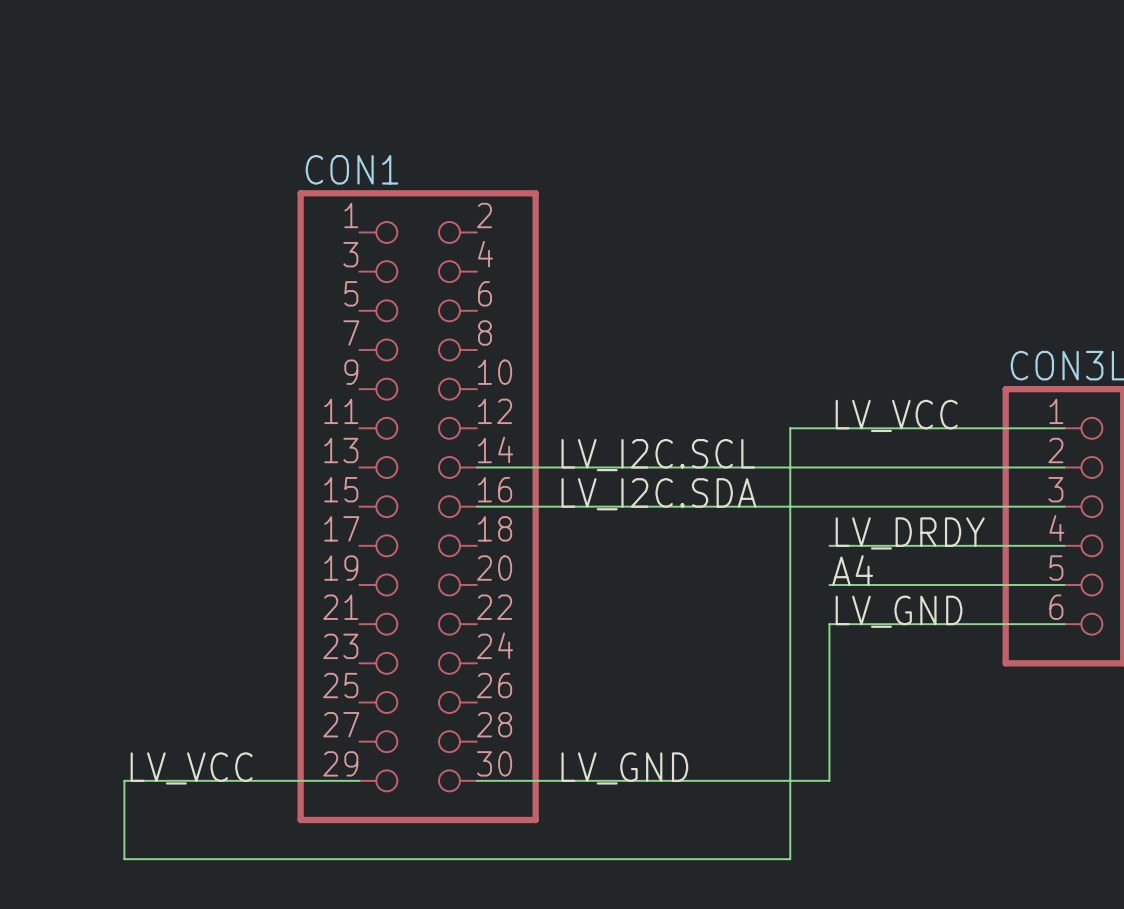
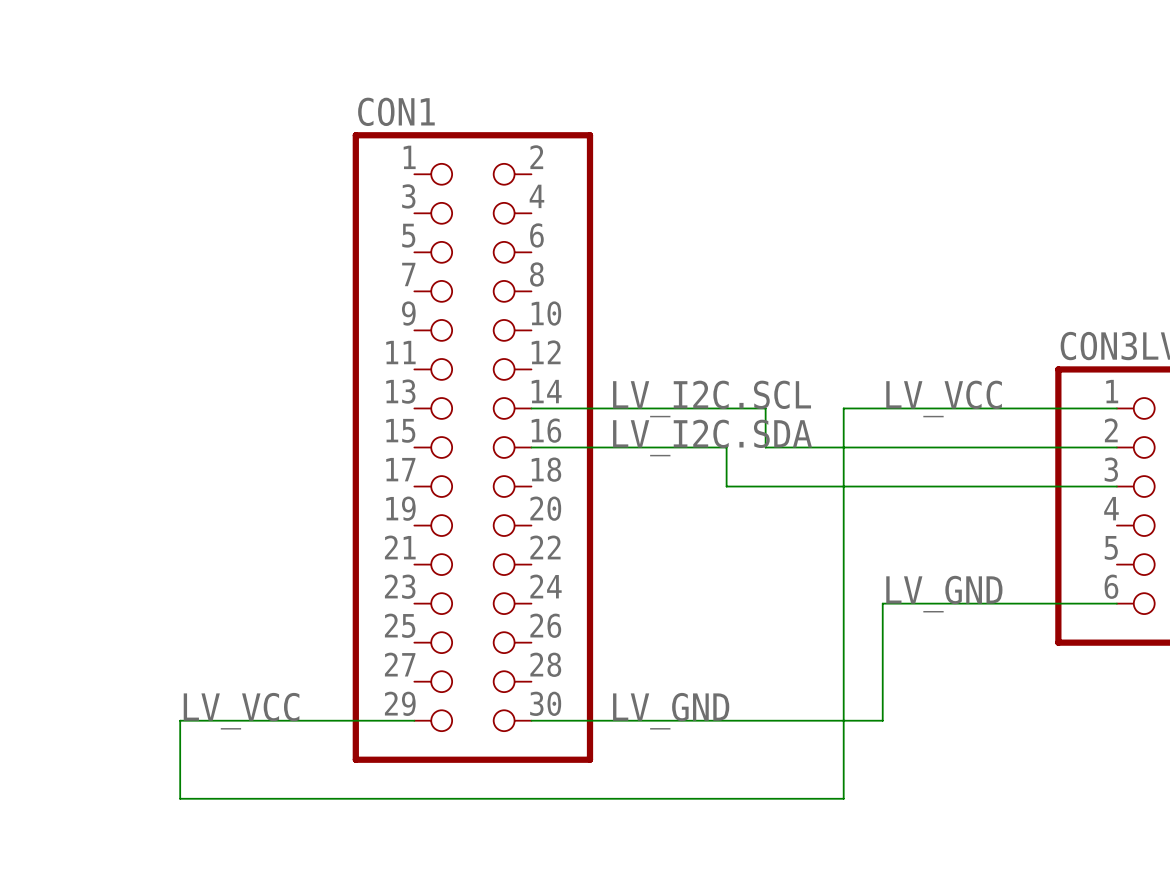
label: none -> LV_I2C.SCL (712, 398)
wire: none -> (531, 408) (765, 408) (765, 447)
label: LV_I2C.SCL (658, 455) -> LV_I2C.SDA (712, 438)
wire: (672, 467) (711, 467) -> (726, 447) (726, 486)
label: LV_I2C.SDA (658, 494) -> none
CON1 position: (418, 506) -> (472, 447)
wire: (476, 506) (672, 506) -> none
label: LV_DRDY (910, 533) -> none
wire: (829, 545) (1064, 545) -> none
label: A4 (852, 570) -> none
wire: (829, 584) (1064, 584) -> none
wire: (829, 741) (829, 780) (476, 780) -> (882, 720) (531, 720)
label position: LV_VCC (191, 768) -> LV_VCC (241, 711)
label position: LV_GND (624, 768) -> LV_GND (671, 711)
wire: (124, 780) (359, 780) -> (180, 759) (180, 720) (414, 720)
wire: (124, 820) (124, 859) (790, 859) (790, 820) -> (180, 798) (843, 798)

